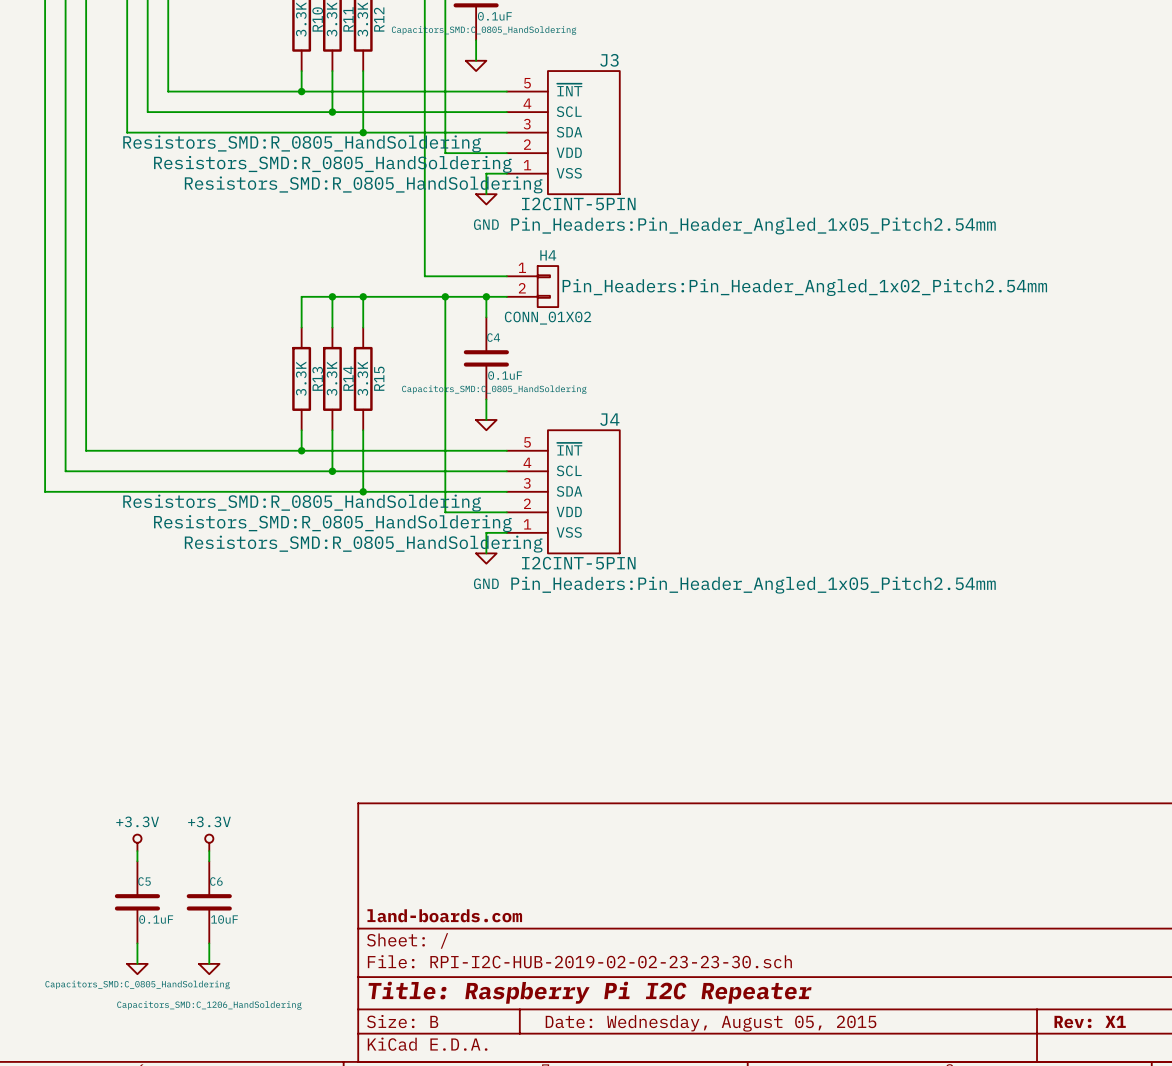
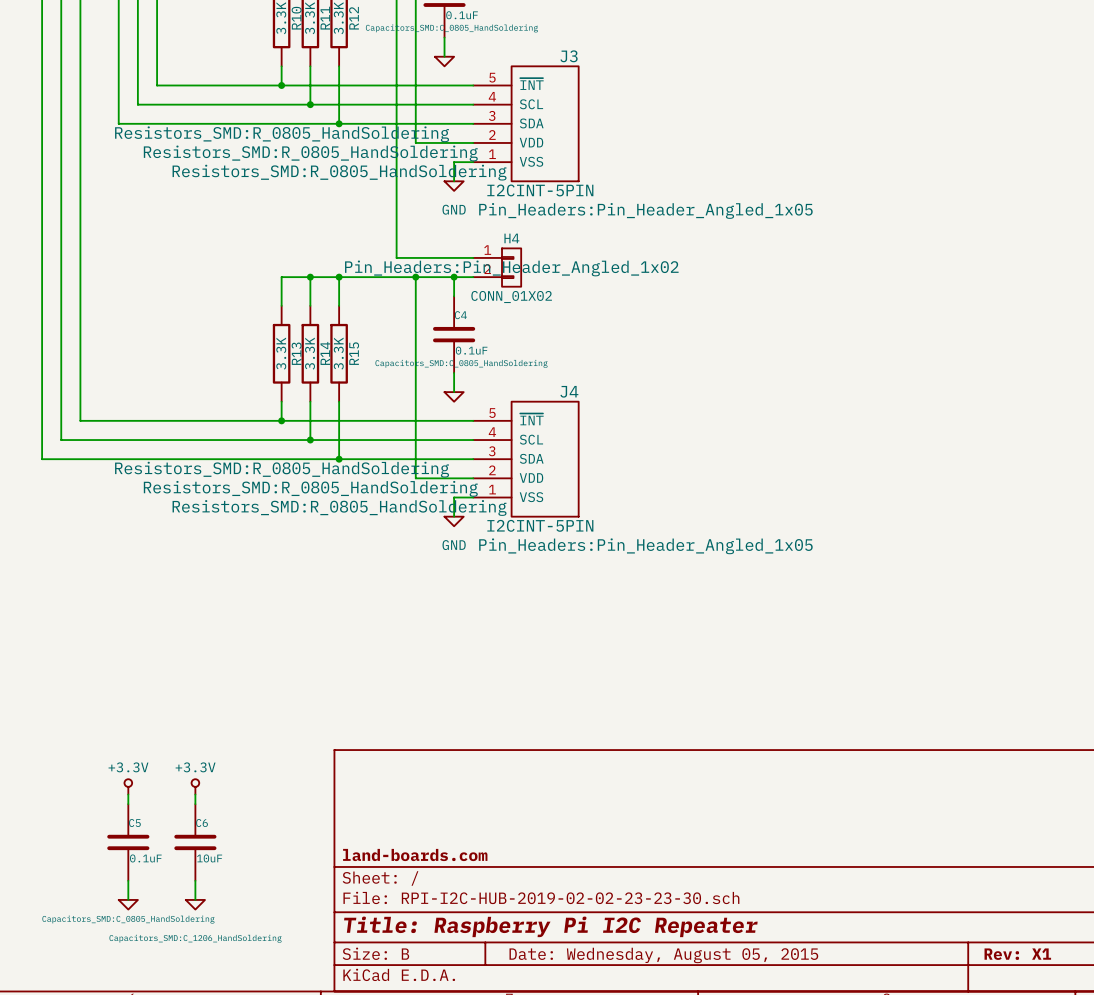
J3 text: Pin_Headers:Pin_Header_Angled_1x05_Pitch2.54mm (753, 225) -> Pin_Headers:Pin_Header_Angled_1x05 (645, 210)
H4 text: Pin_Headers:Pin_Header_Angled_1x02_Pitch2.54mm (804, 287) -> Pin_Headers:Pin_Header_Angled_1x02 (511, 268)
J4 text: Pin_Headers:Pin_Header_Angled_1x05_Pitch2.54mm (753, 585) -> Pin_Headers:Pin_Header_Angled_1x05 (645, 546)

